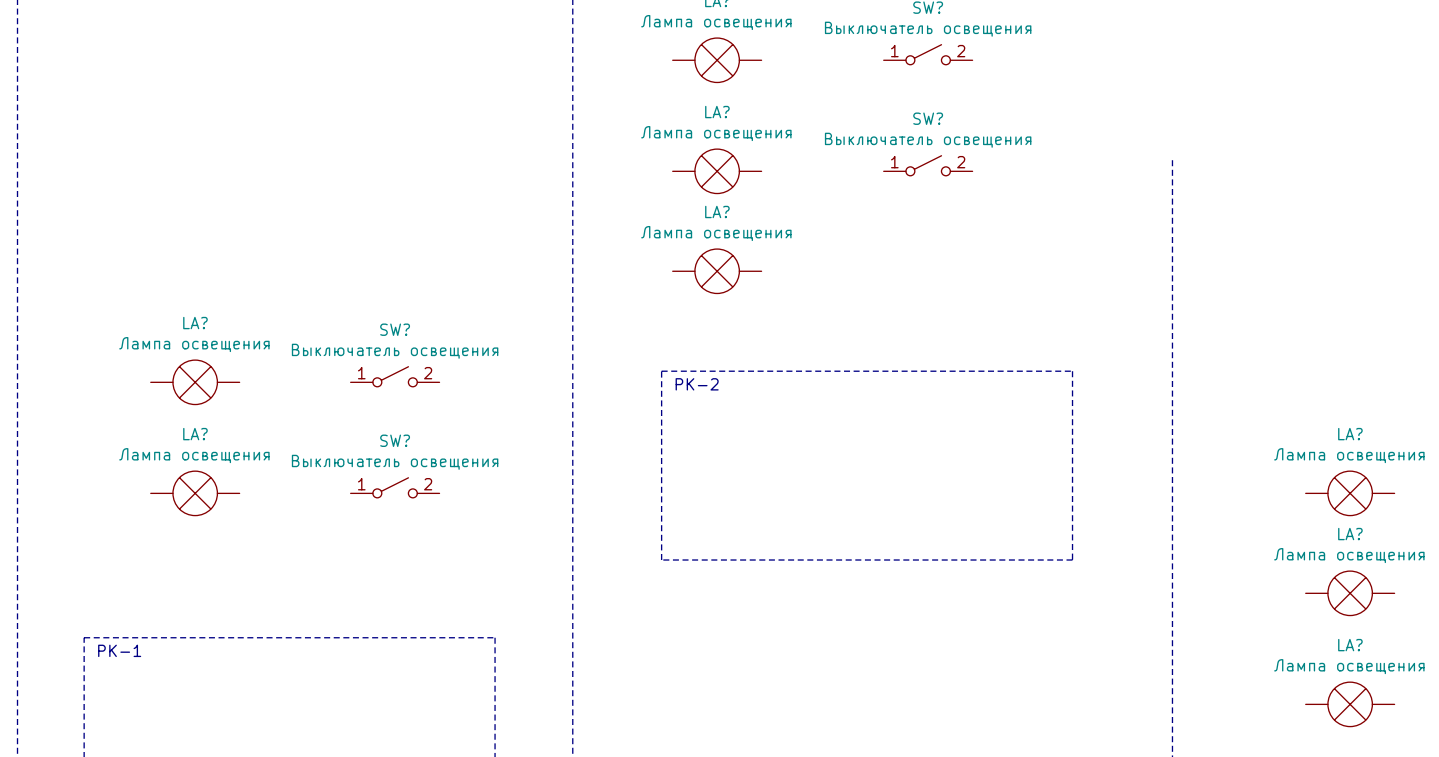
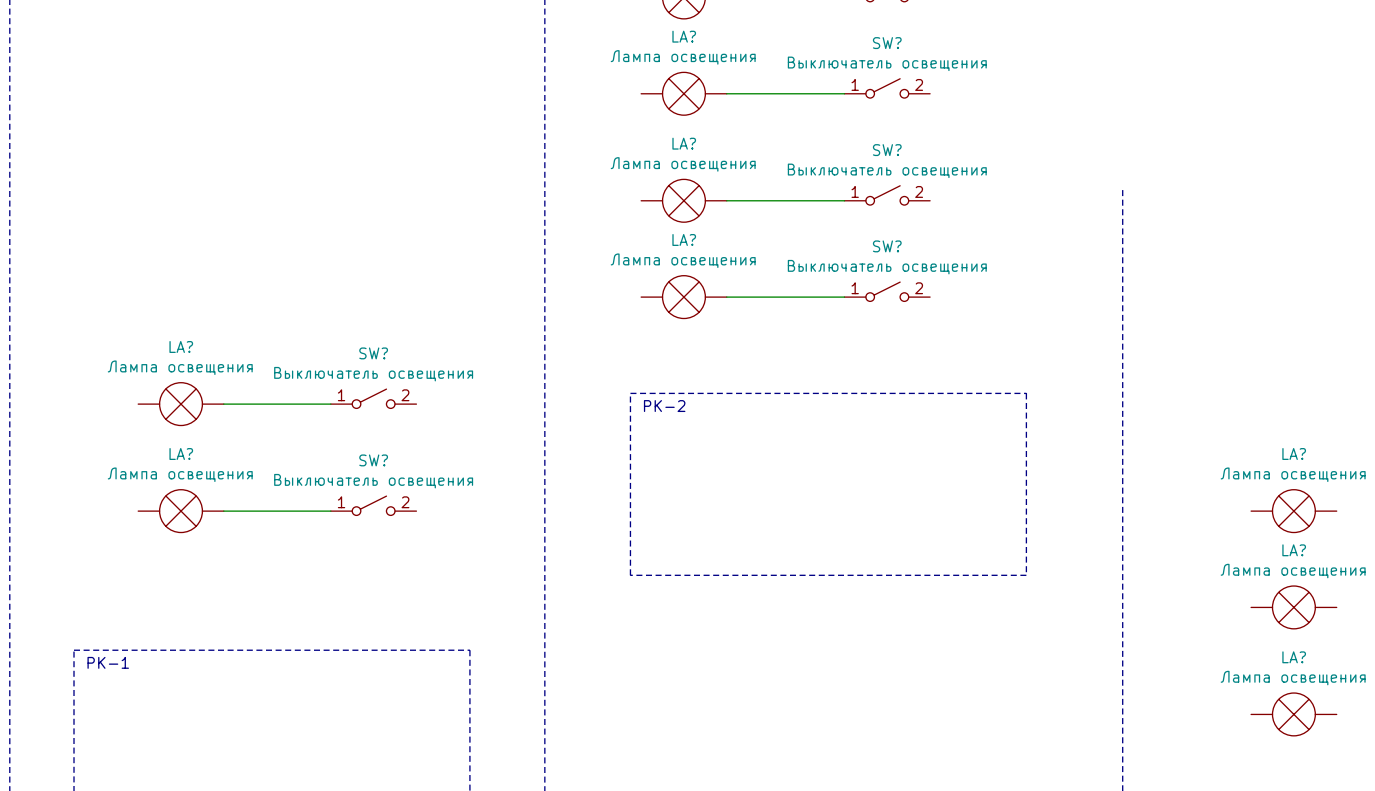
wire: none -> (726, 93) (844, 93)
wire: none -> (726, 200) (844, 200)
SW?: none -> Выключатель освещения (887, 291)
wire: none -> (726, 297) (844, 297)
wire: none -> (223, 404) (330, 404)
wire: none -> (223, 511) (330, 511)

